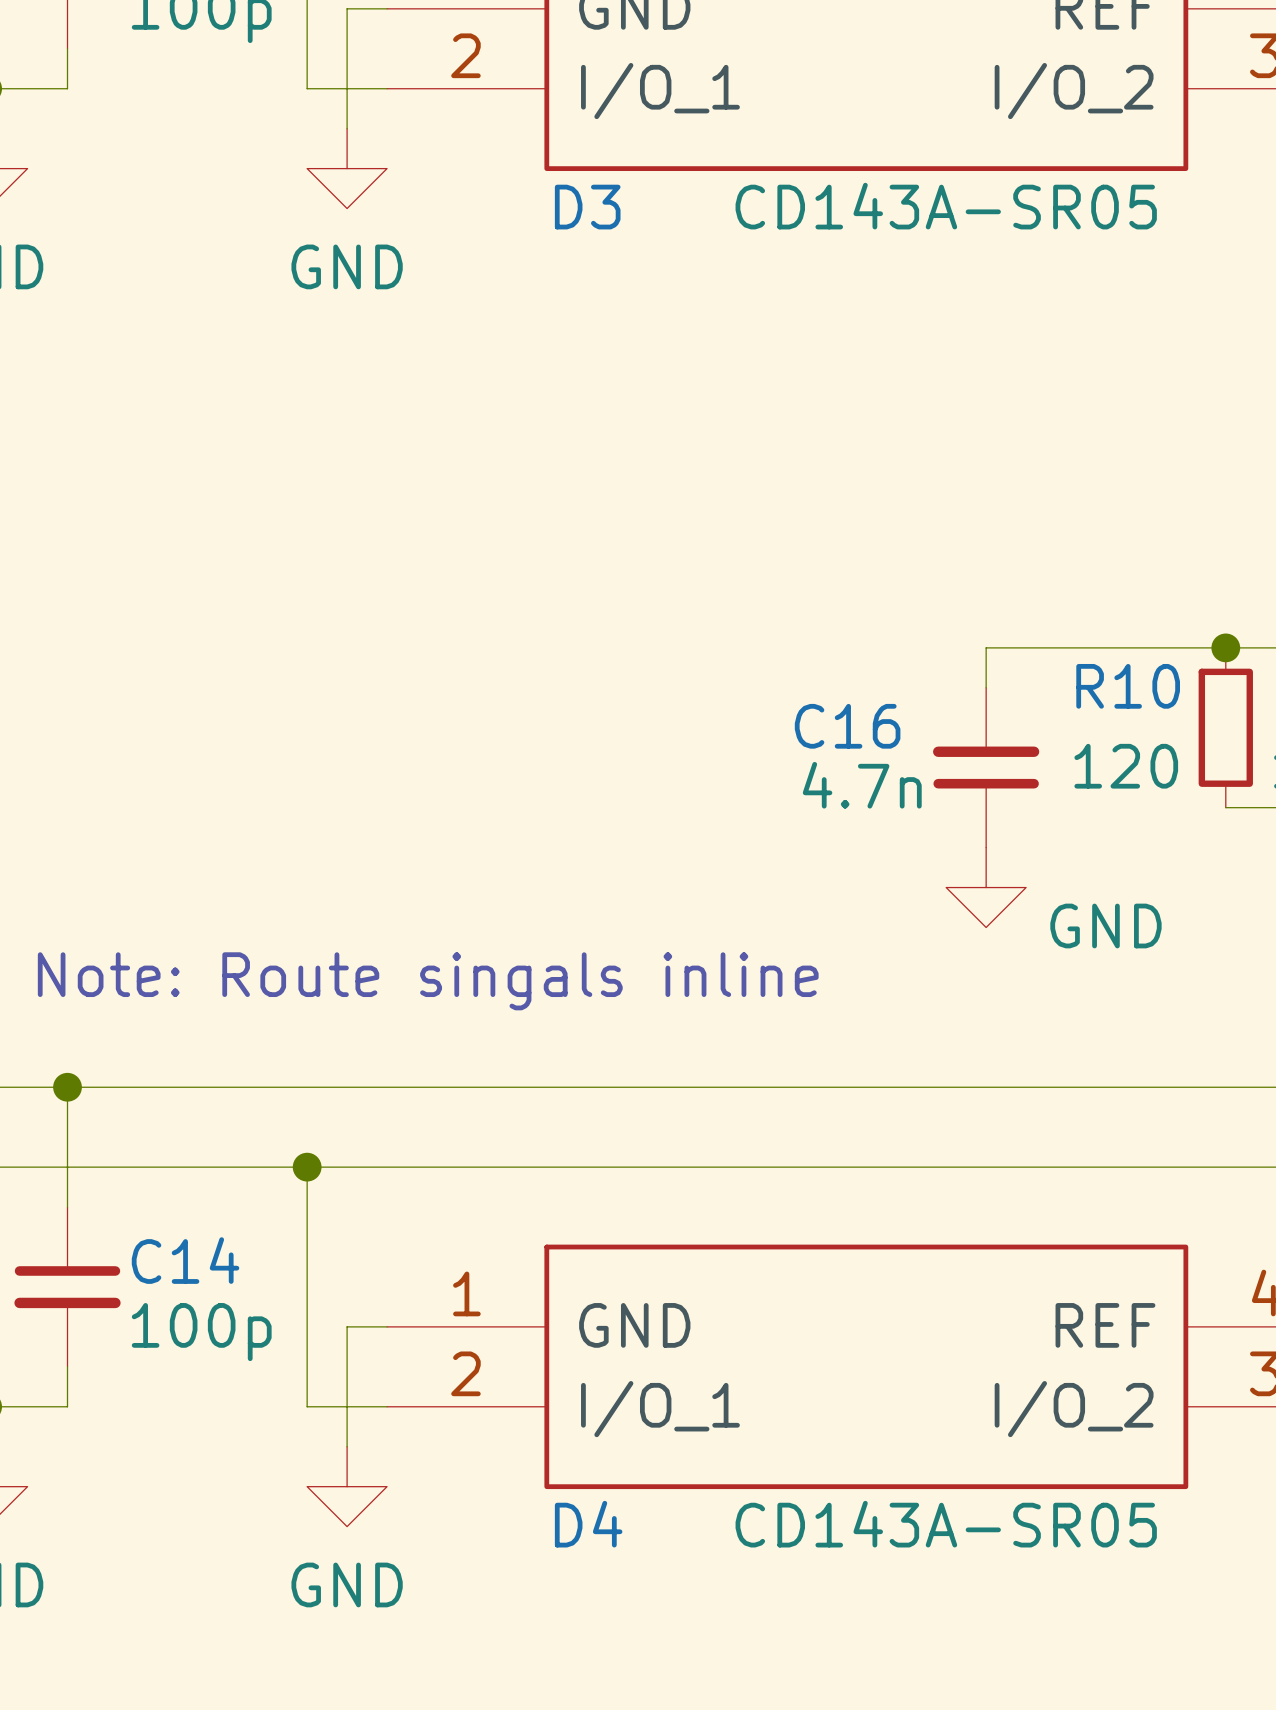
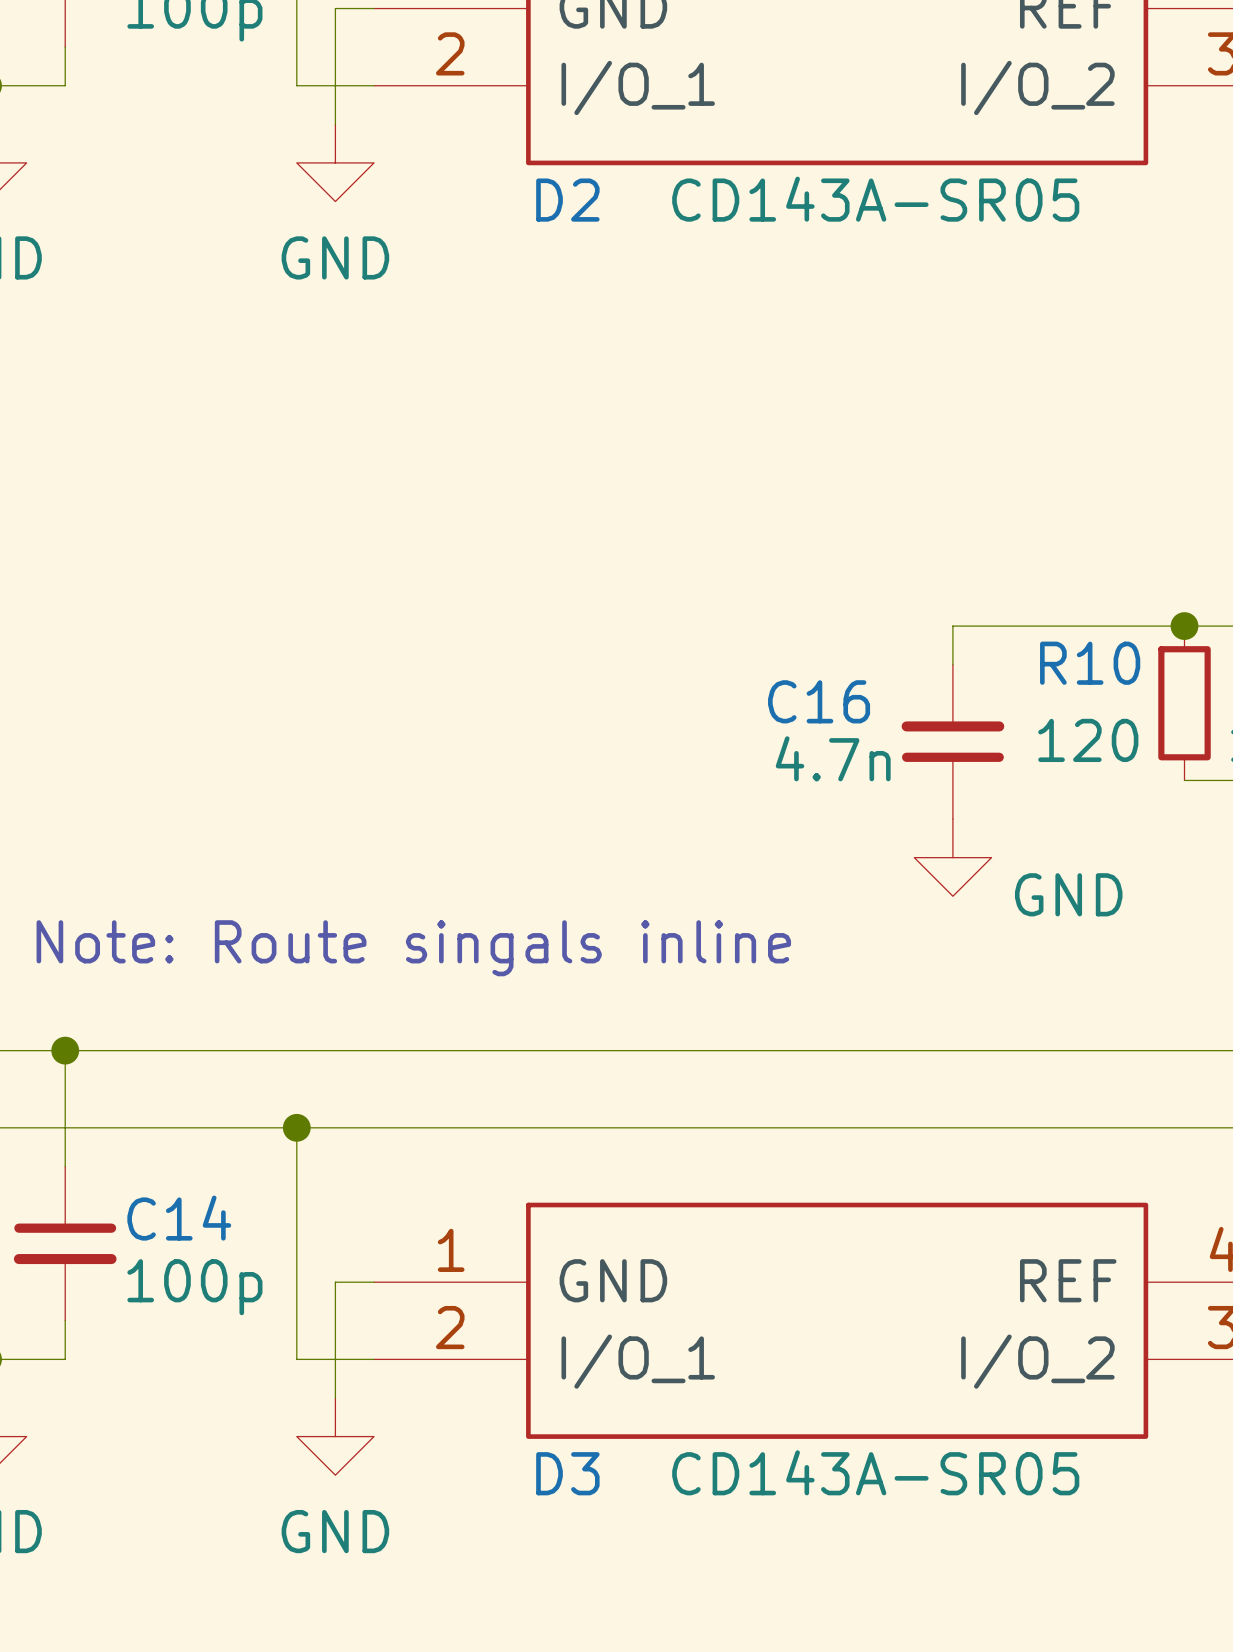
D3 value position: CD143A-SR05 (946, 206) -> CD143A-SR05 (875, 199)
D3 name: D3 (587, 207) -> D2 (567, 200)
D4 name: D4 (588, 1524) -> D3 (567, 1473)
D4 value position: CD143A-SR05 (946, 1524) -> CD143A-SR05 (875, 1472)

